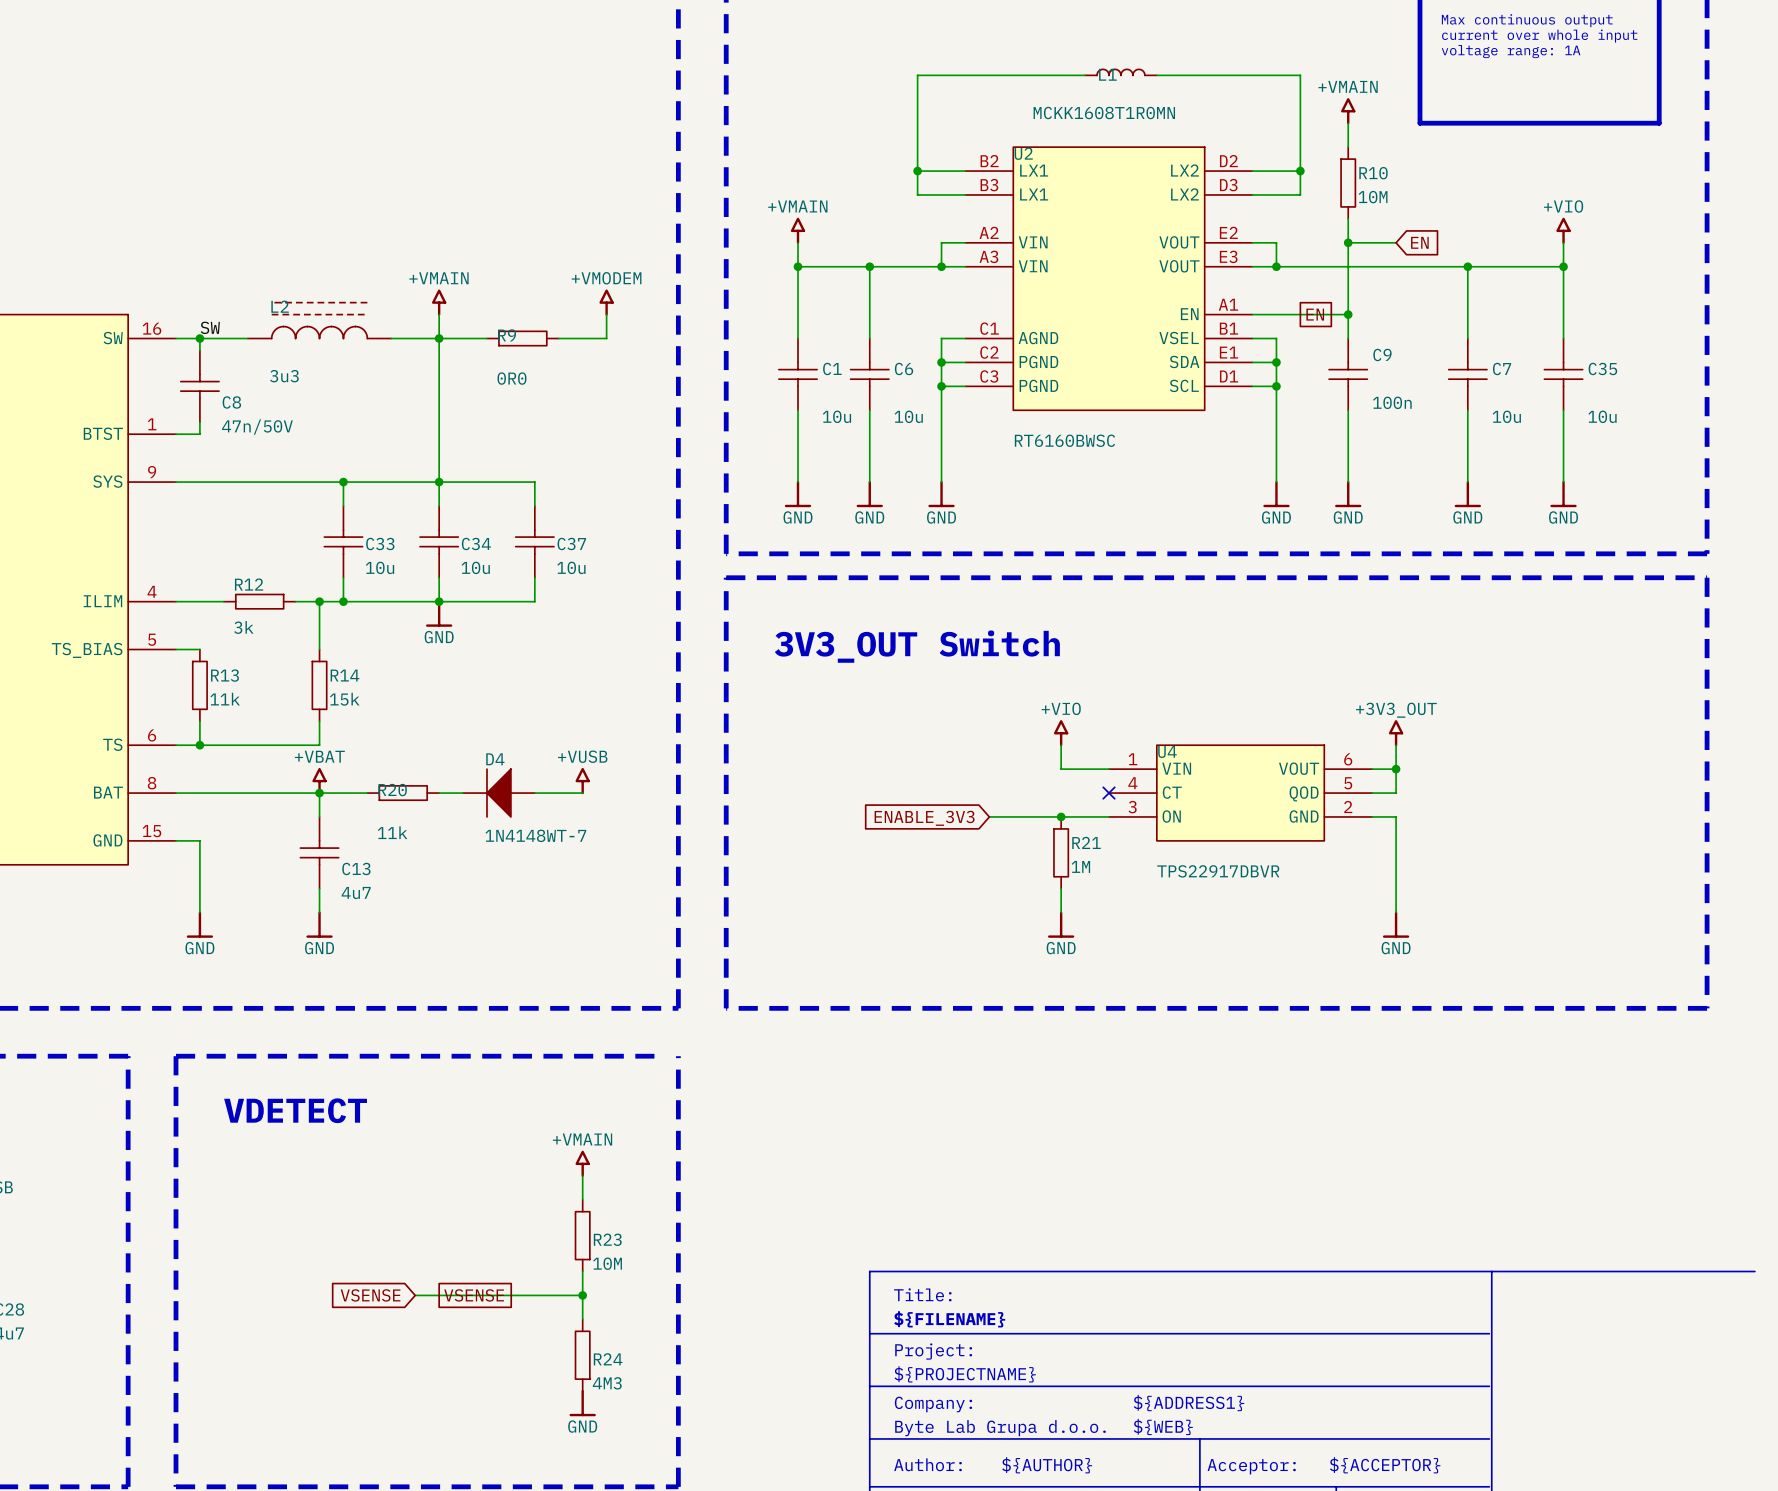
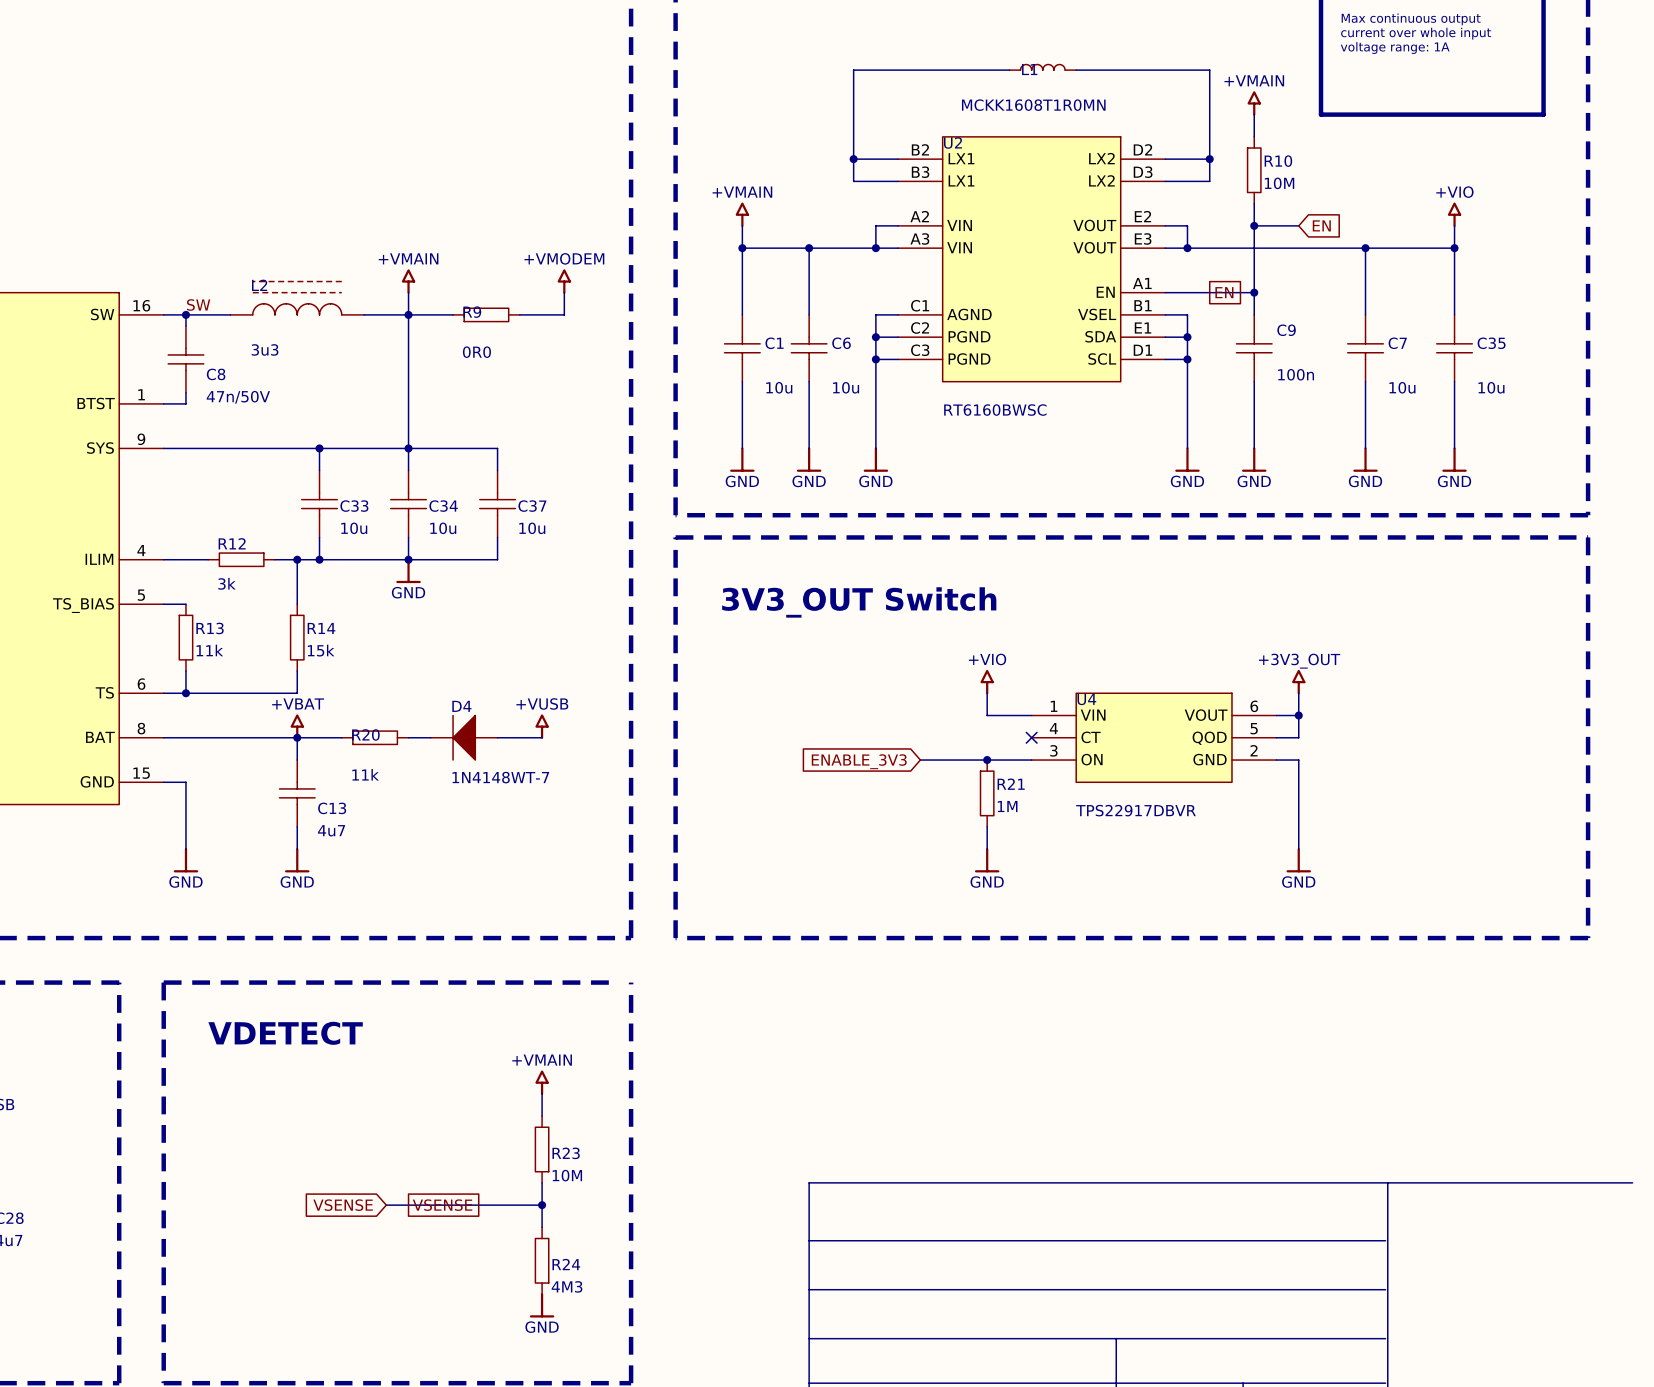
text: Title: (922, 1294) -> none
text: ${FILENAME} (949, 1319) -> none
text: Project: (933, 1351) -> none
text: ${PROJECTNAME} (965, 1374) -> none
text: ${ADDRESS1} (1189, 1403) -> none
text: Company: (933, 1404) -> none
text: ${WEB} (1163, 1426) -> none
text: Byte Lab Grupa d.o.o. (1000, 1428) -> none
text: Author: (928, 1464) -> none
text: ${AUTHOR} (1047, 1465) -> none
text: ${ACCEPTOR} (1385, 1465) -> none
text: Acceptor: (1251, 1466) -> none

